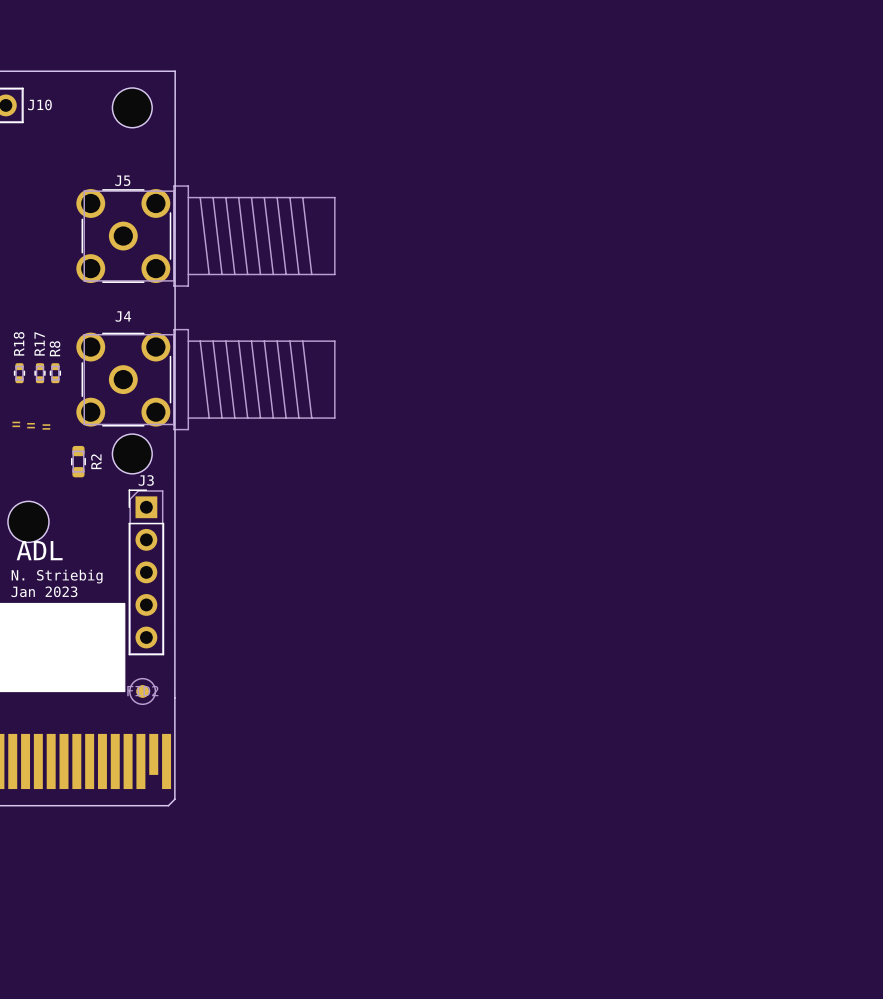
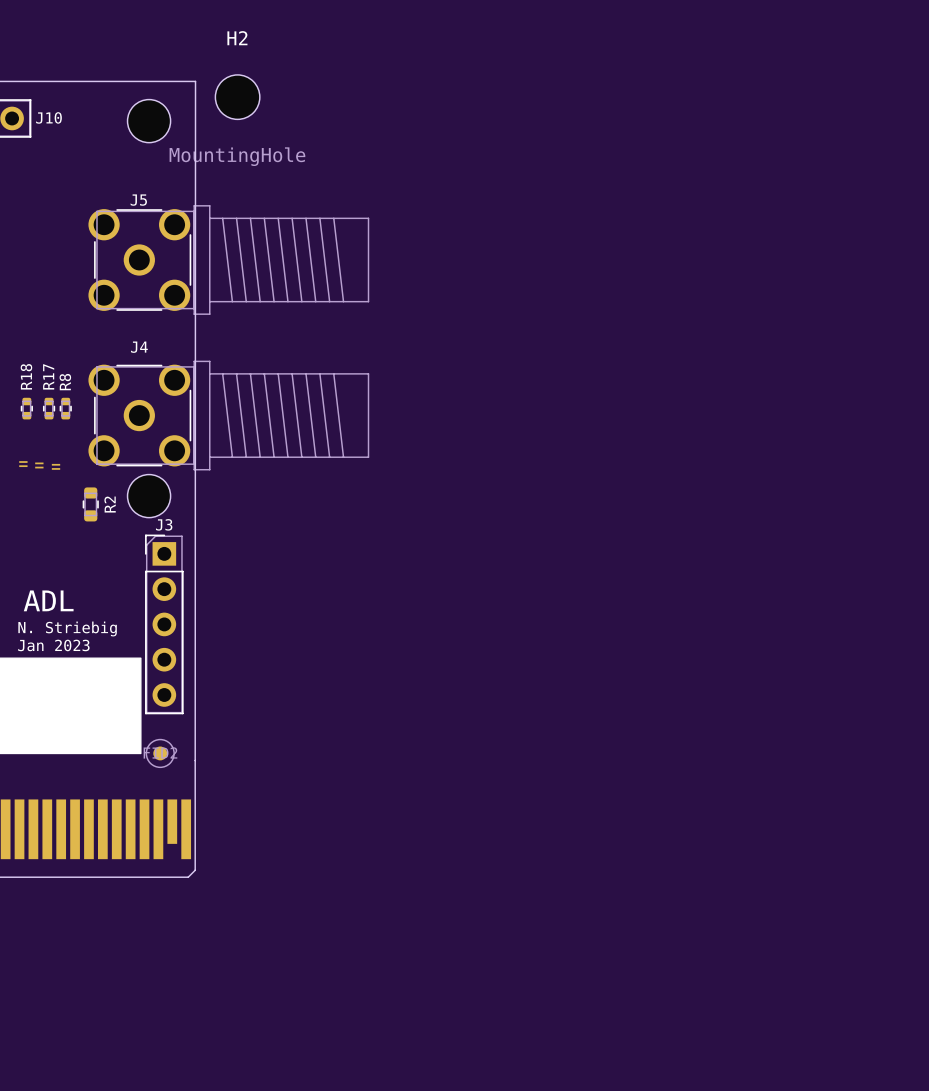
H2: none -> MountingHole (237, 97)
part: (28, 521) -> none

